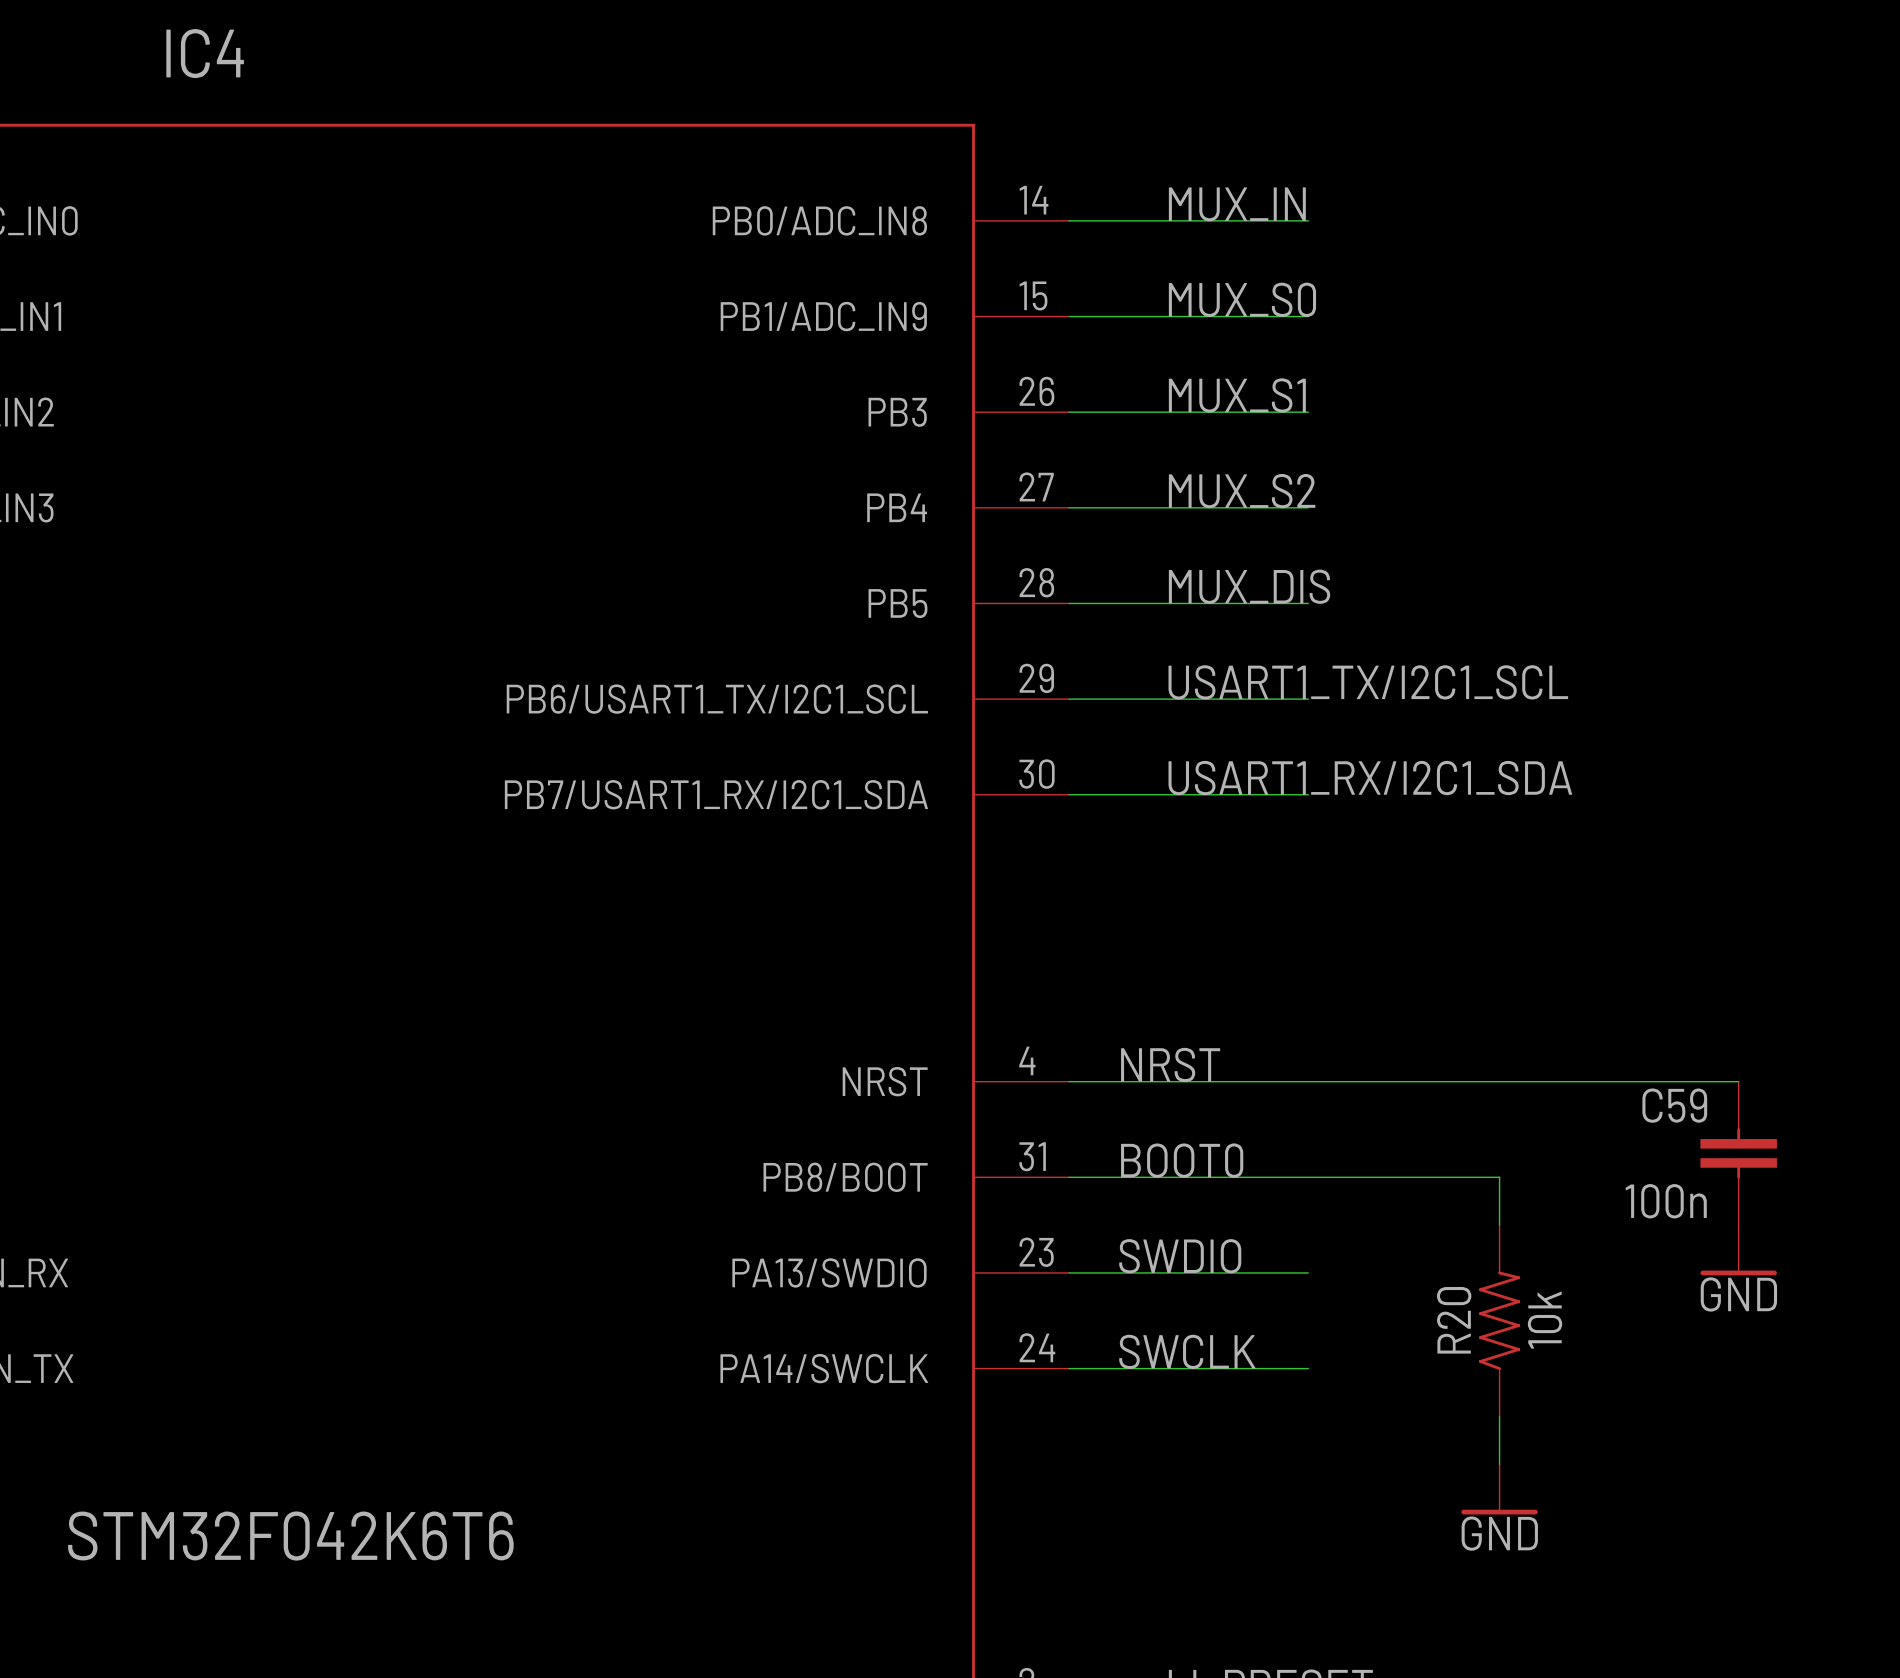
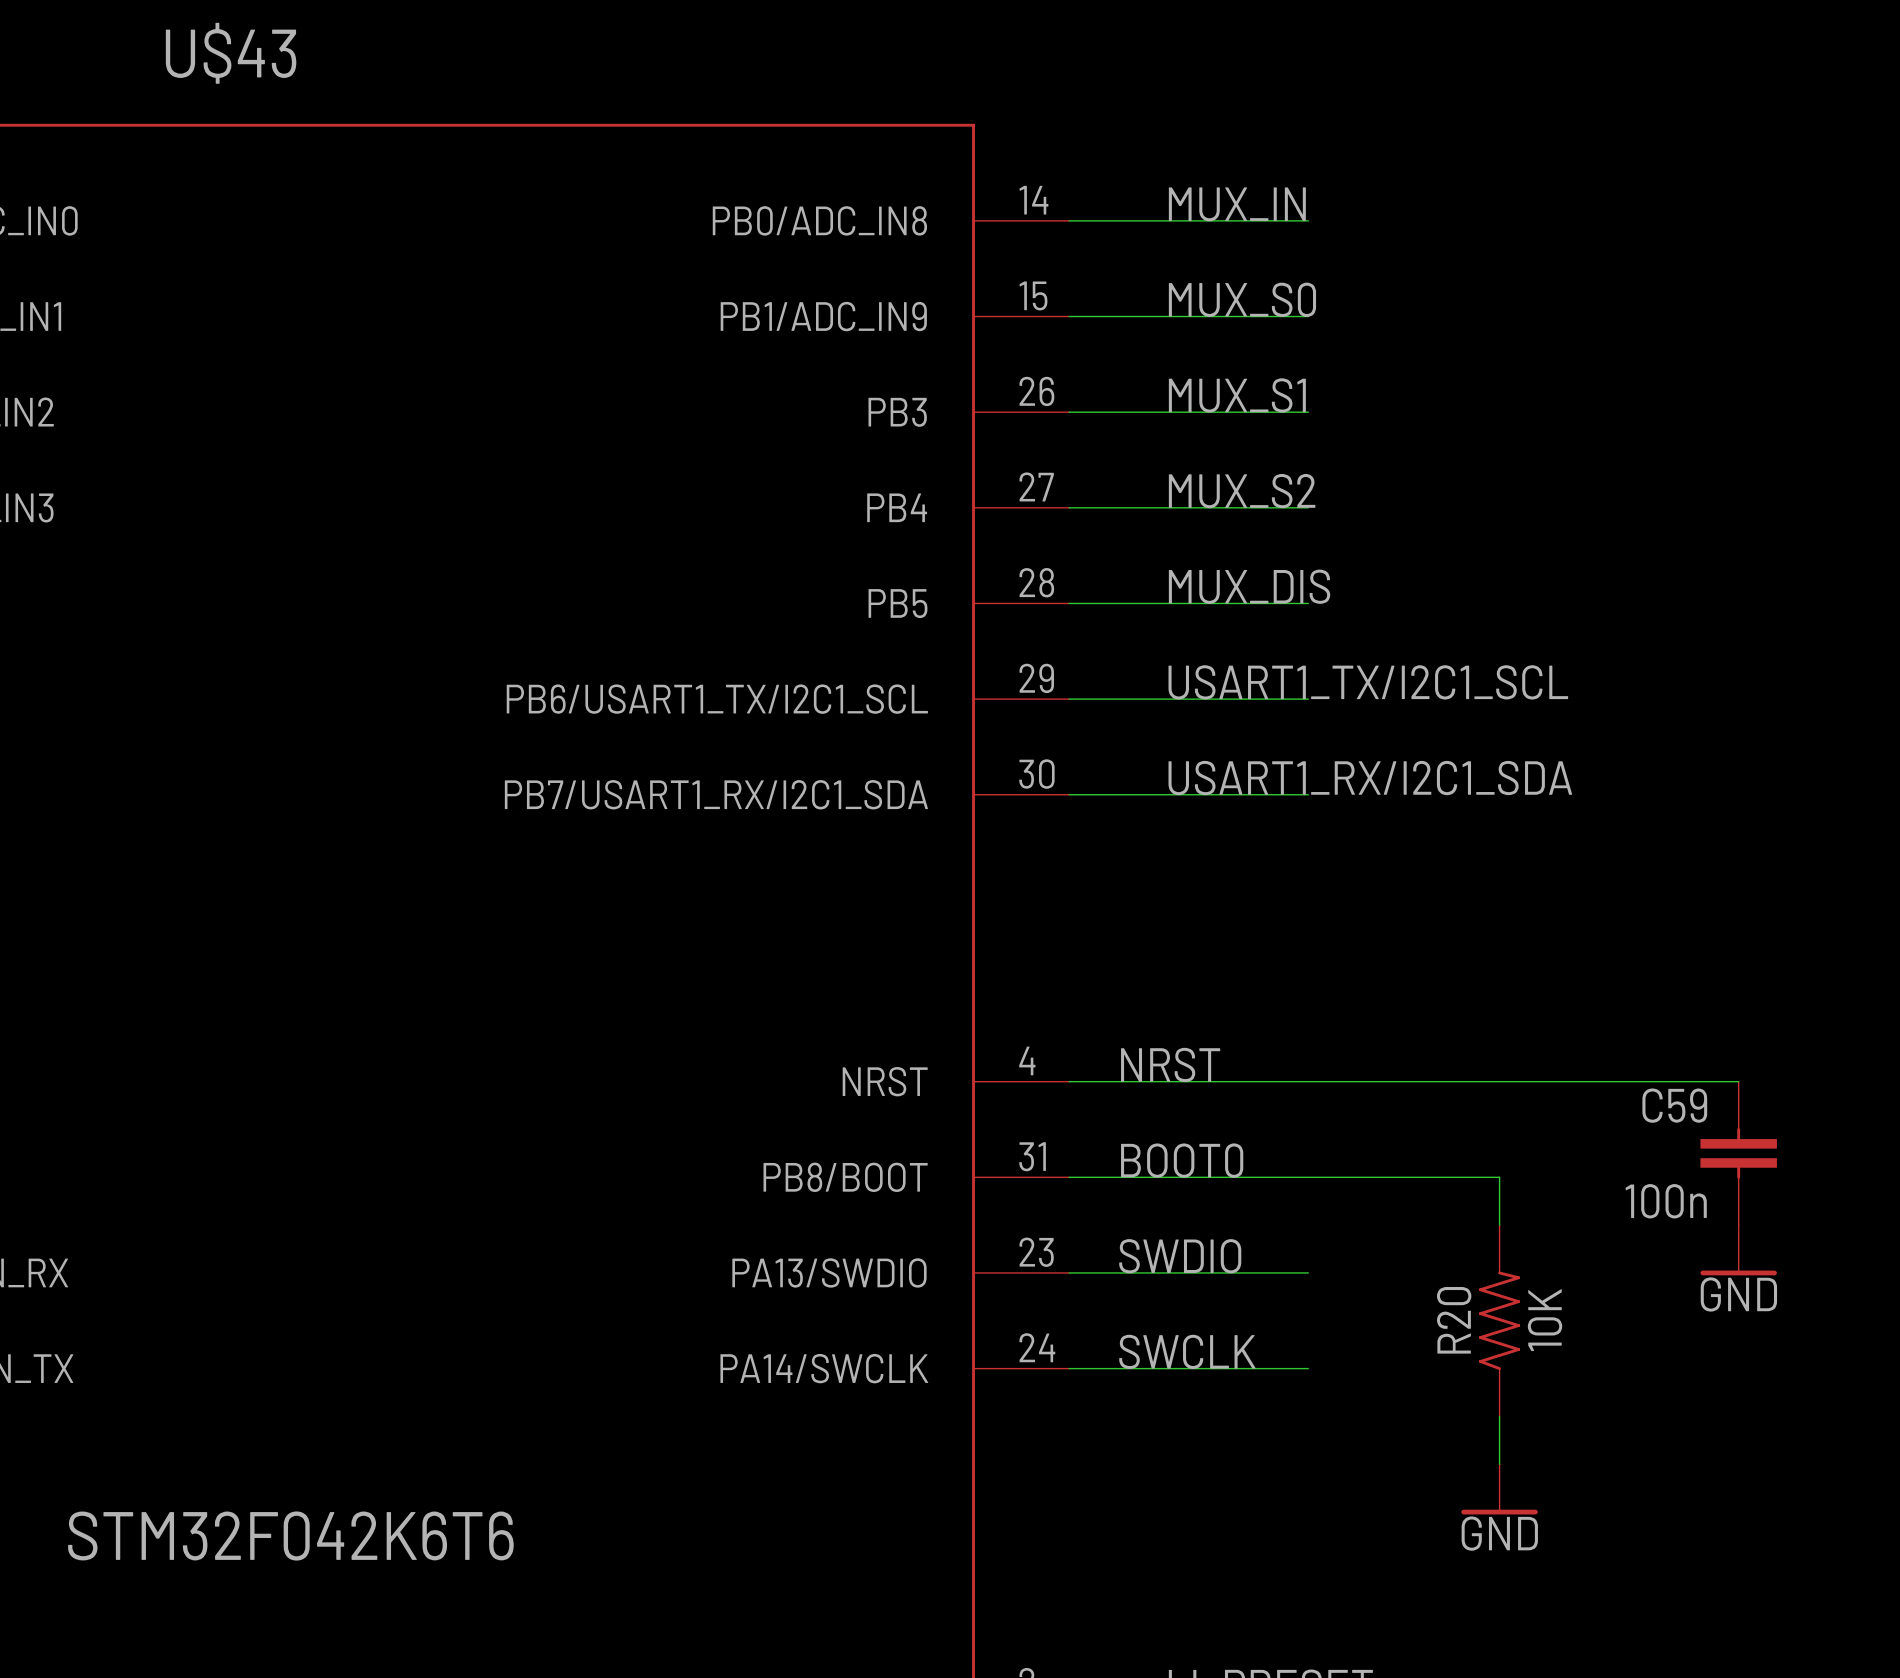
IC4 name: IC4 (205, 53) -> U$43 (231, 53)
R20 value: 10k (1545, 1320) -> 10K (1545, 1320)

